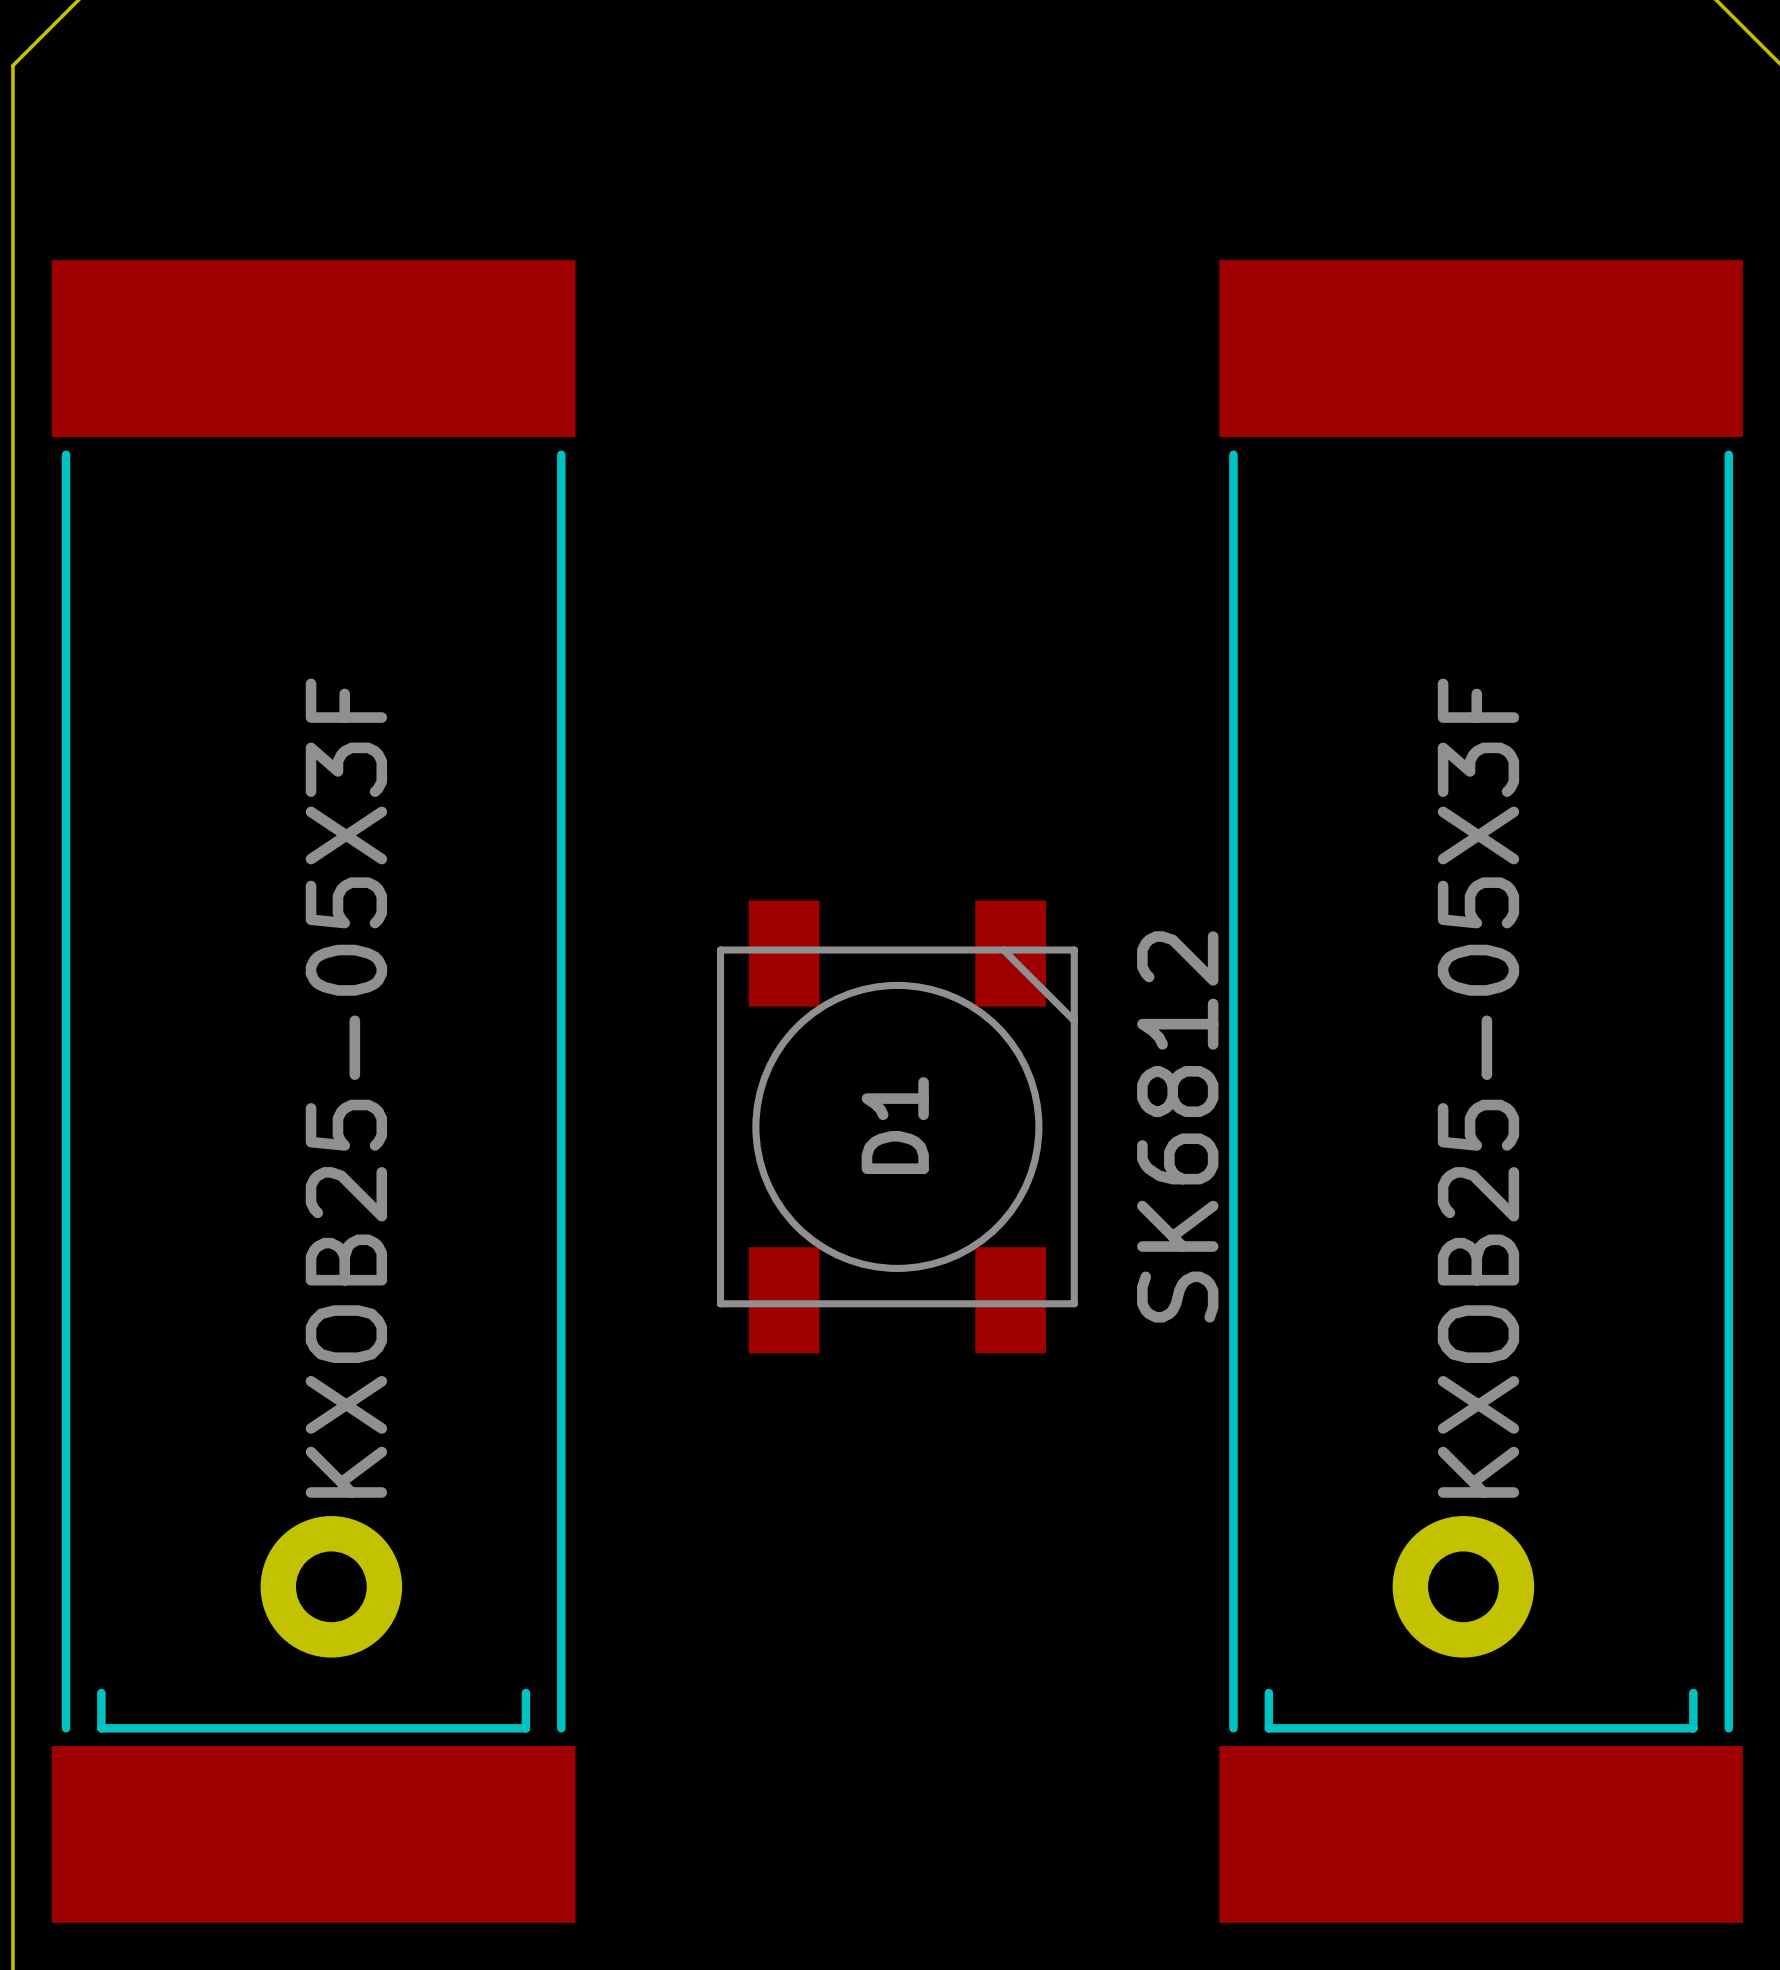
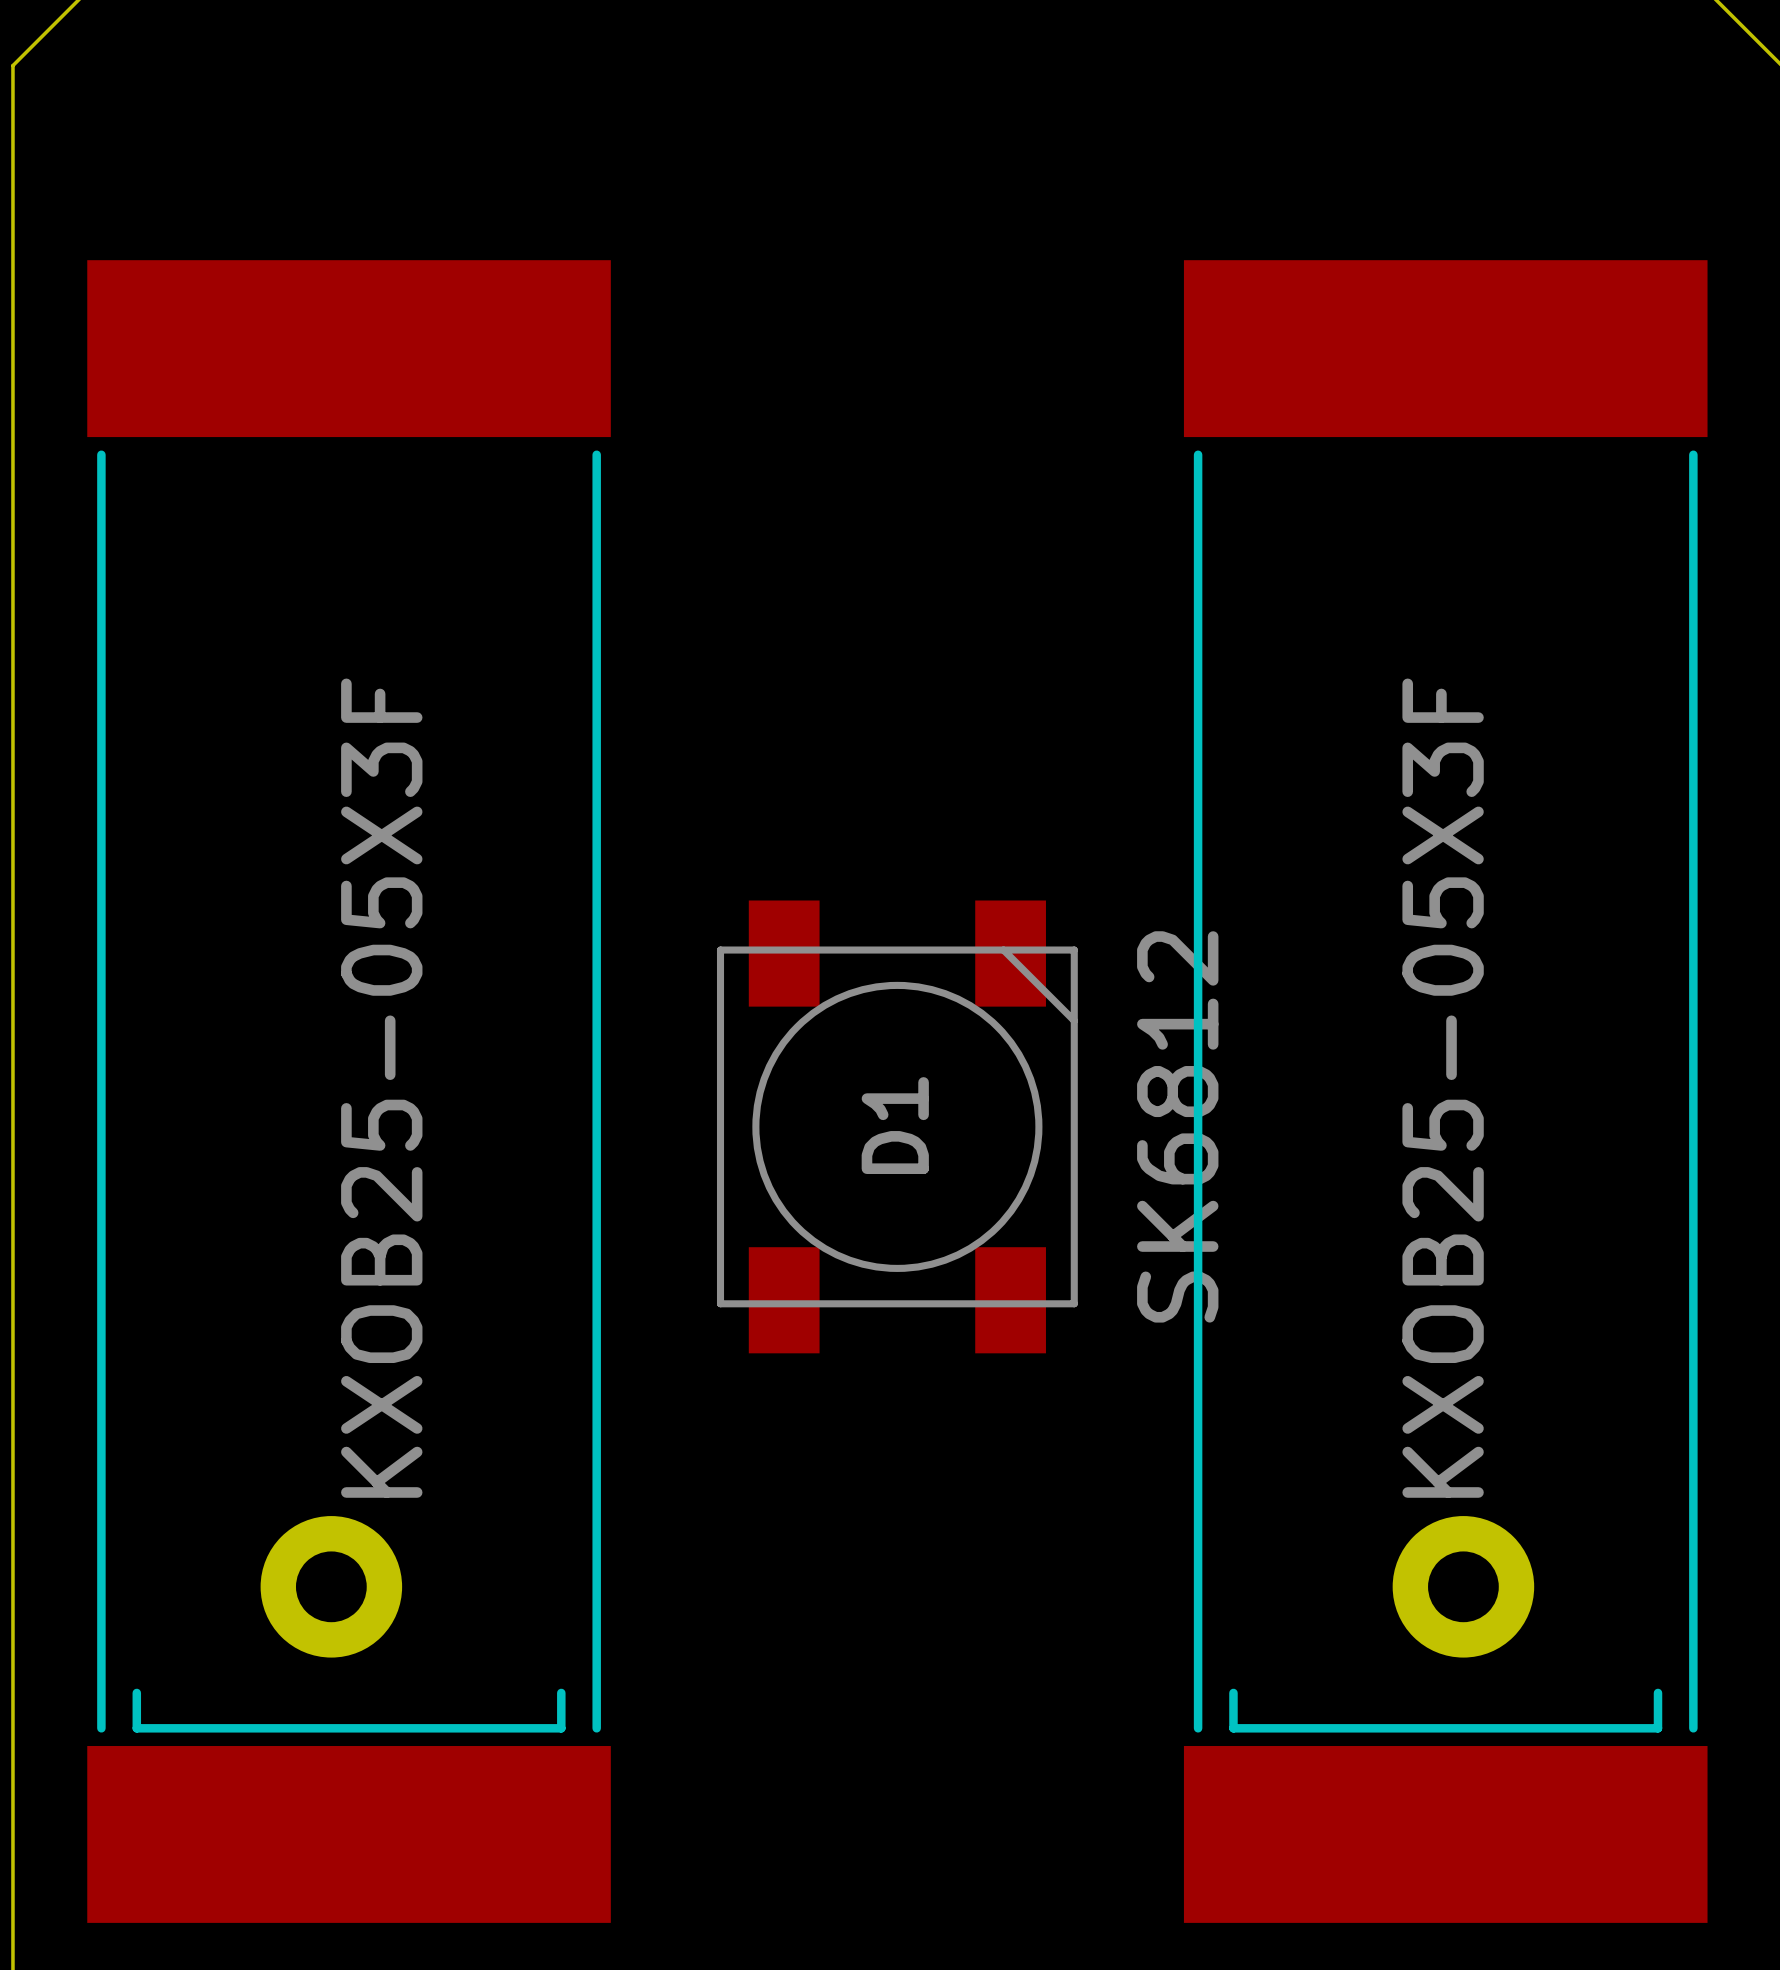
part position: (313, 1091) -> (349, 1091)
part position: (1481, 1091) -> (1445, 1091)

